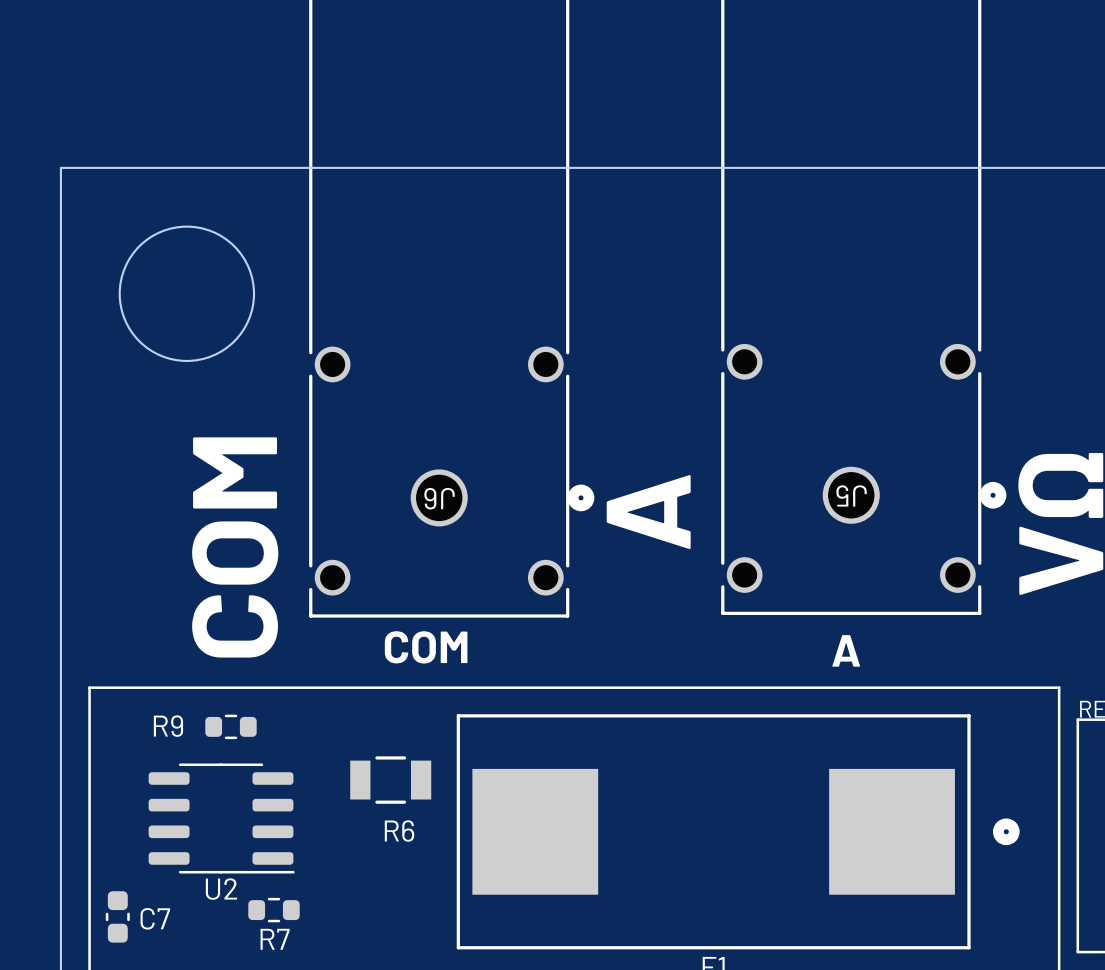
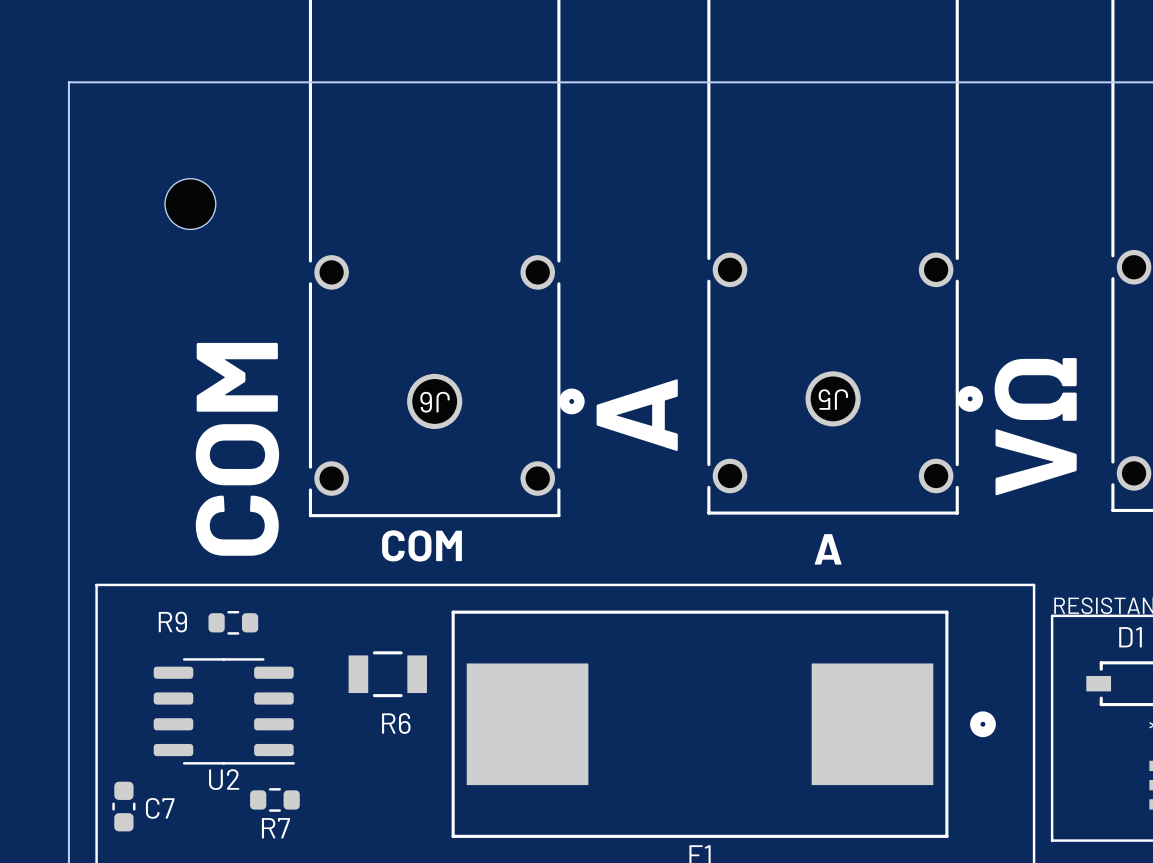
round board edge: [118, 225, 256, 362] -> none
part: none -> (190, 204)

